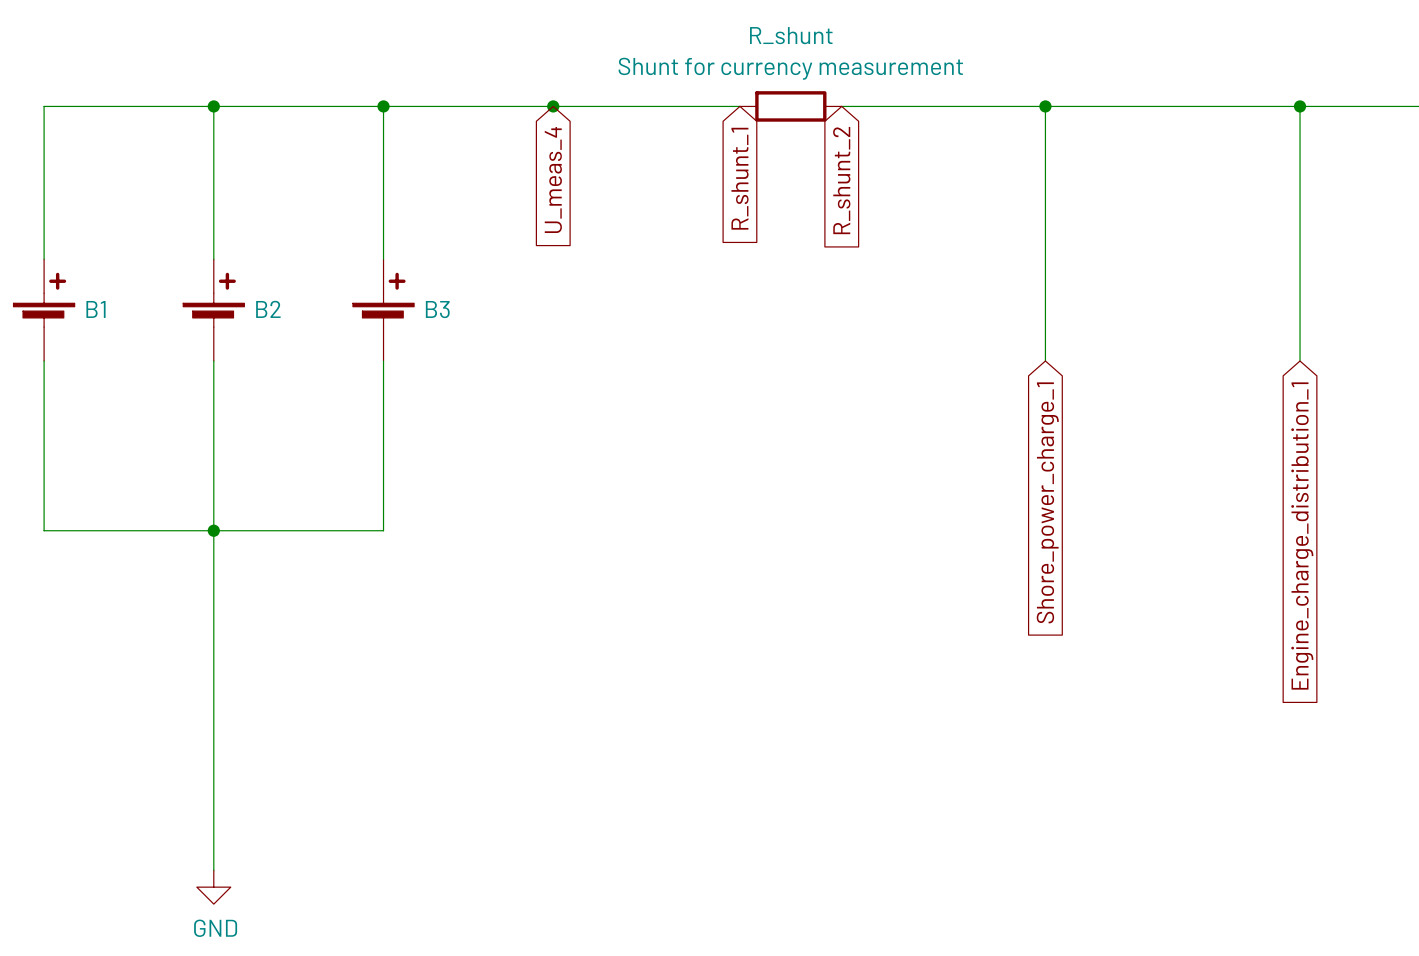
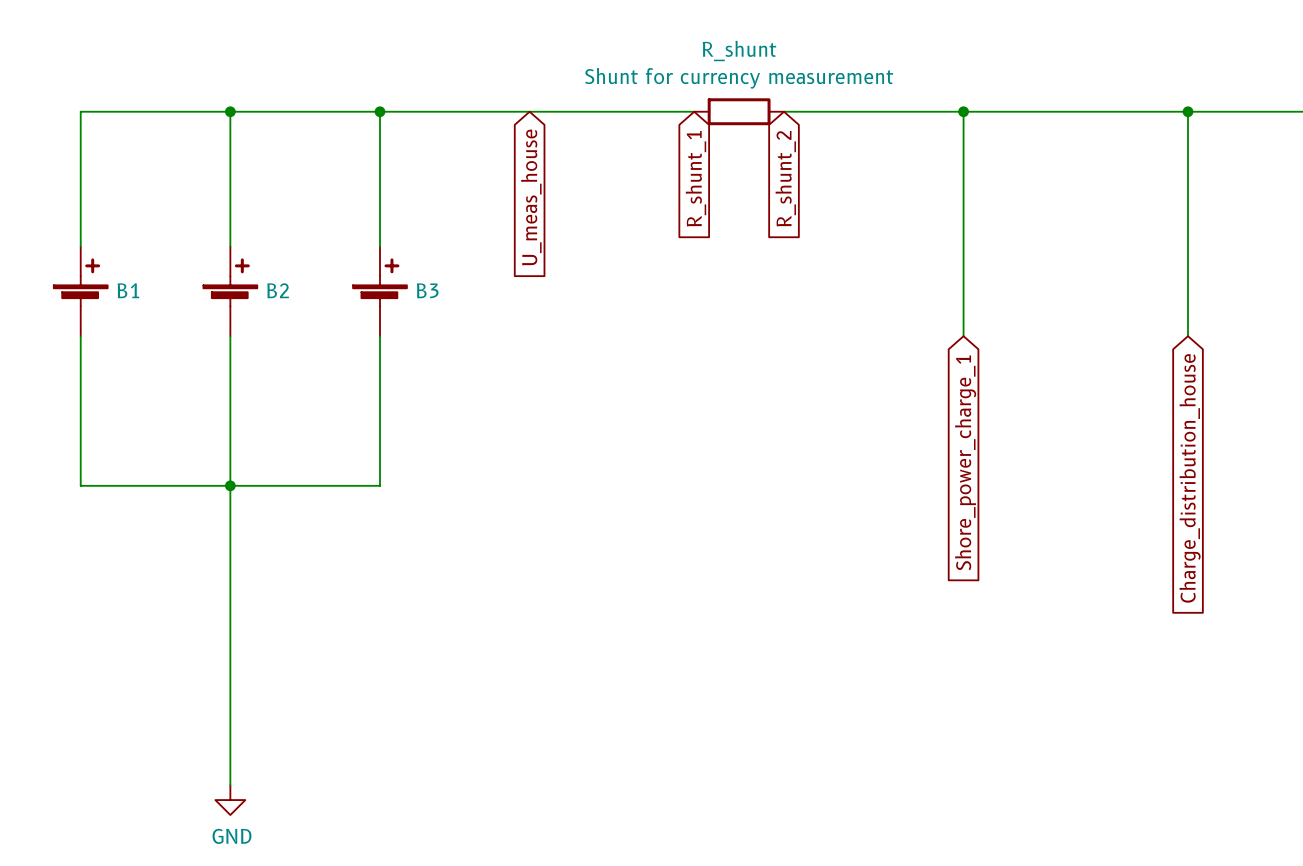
junction: (553, 106) -> none
global label: U_meas_4 (553, 180) -> U_meas_house (531, 197)
global label: Engine_charge_distribution_1 (1302, 535) -> Charge_distribution_house (1190, 478)

